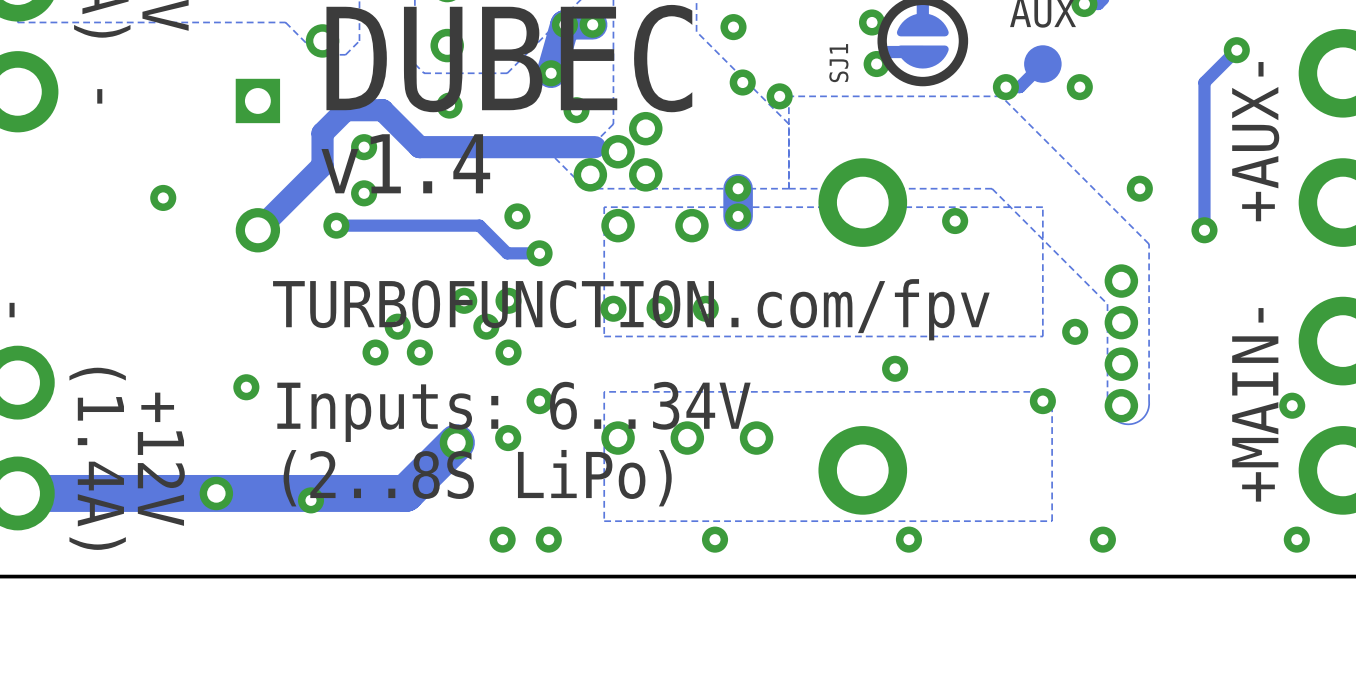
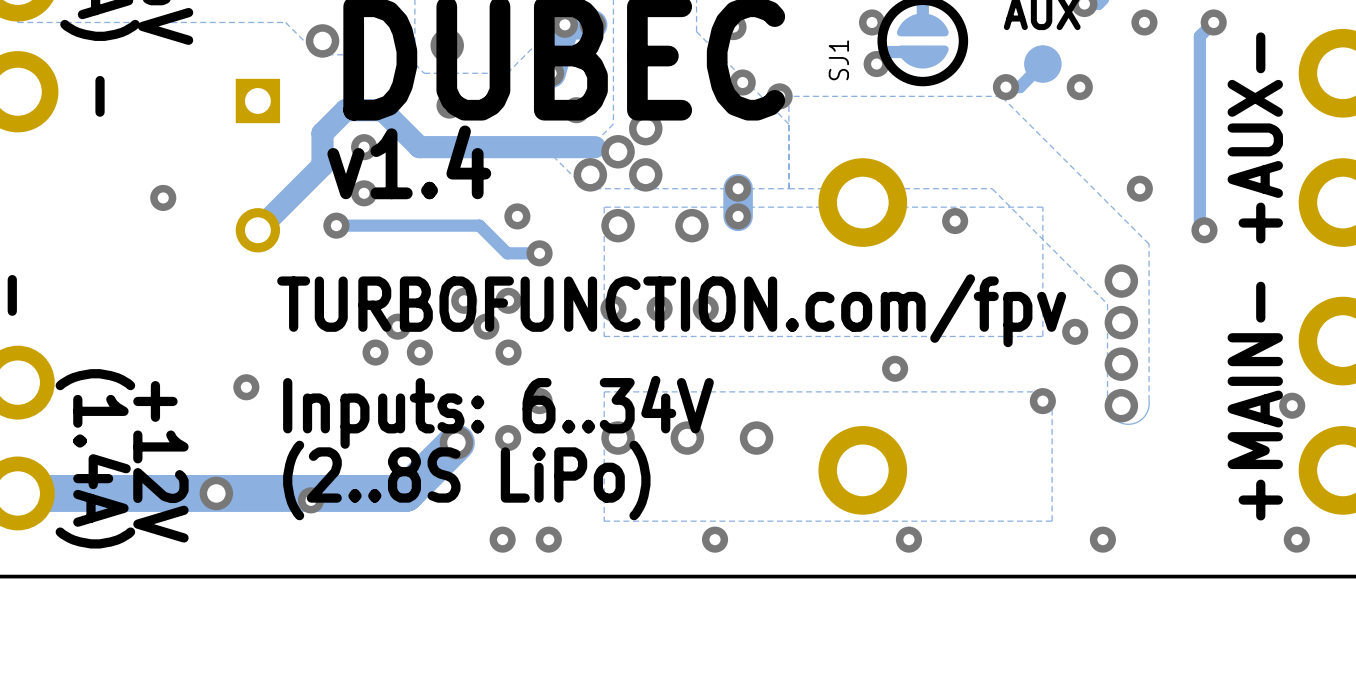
via: none -> (1144, 22)
track: none -> (1213, 22) (1199, 36) (1199, 230)
track: (1236, 50) (1204, 82) (1204, 230) -> none
via position: (1236, 50) -> (1213, 22)

